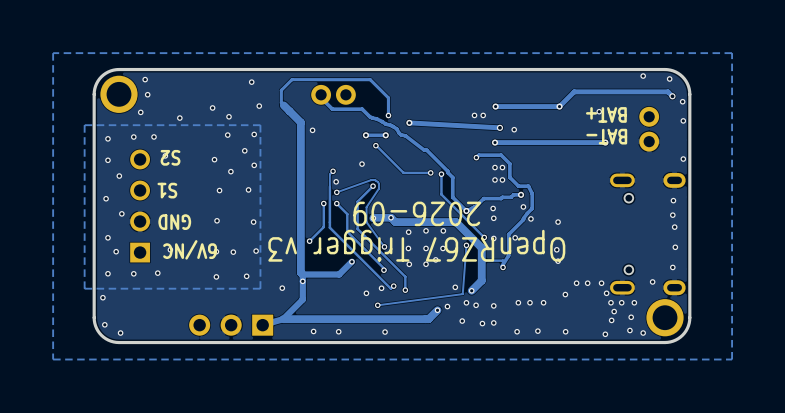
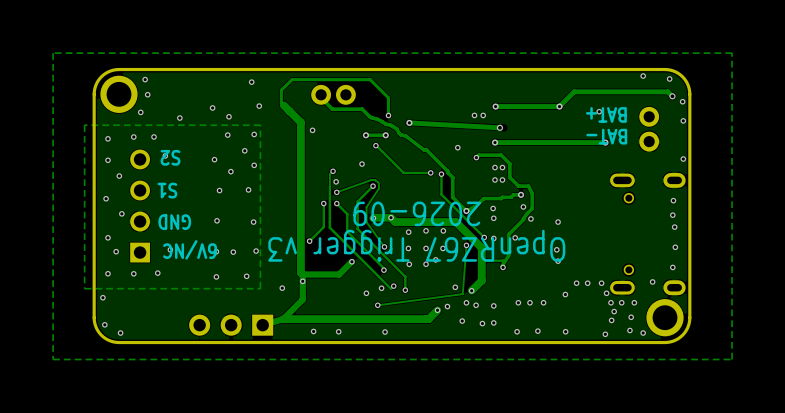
via position: (514, 129) -> (457, 147)

